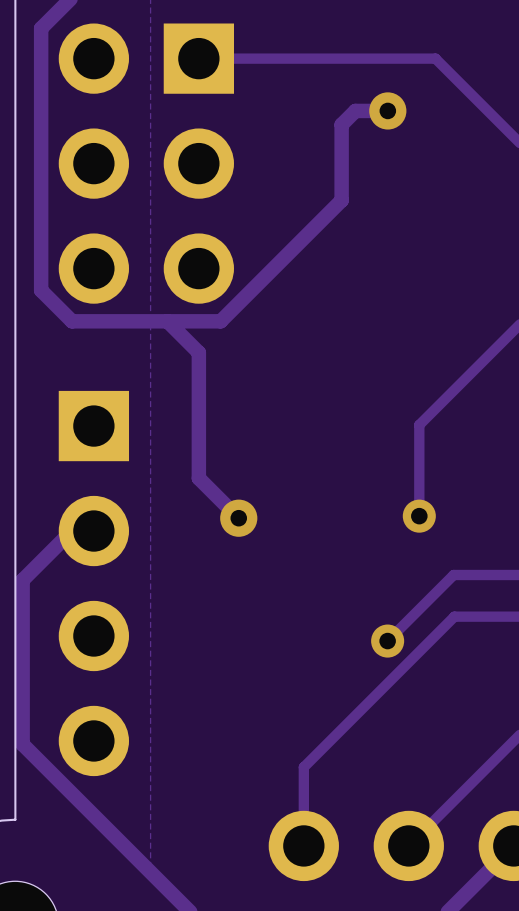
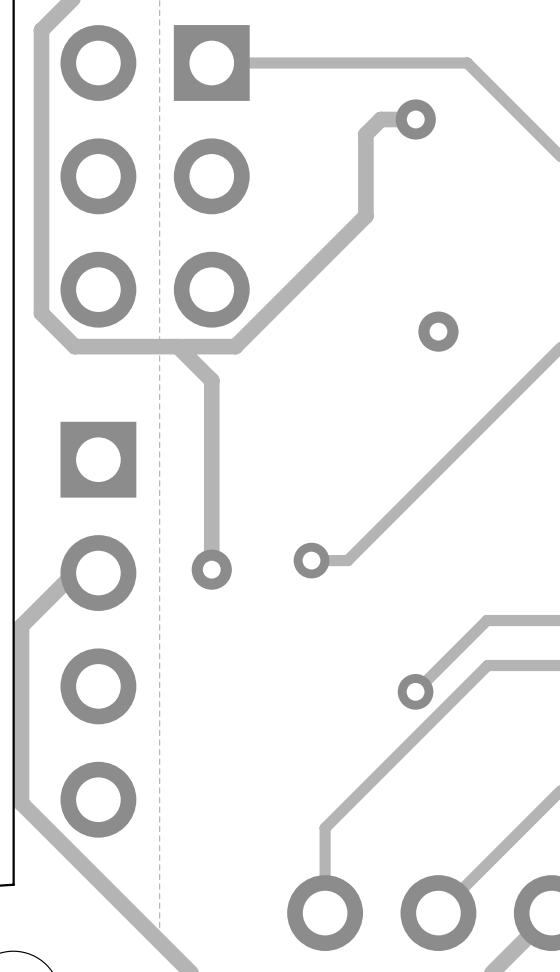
via: none -> (438, 331)
track: (419, 424) (419, 516) -> (449, 458) (347, 560) (311, 560)
track: (198, 478) (238, 518) -> (211, 516) (211, 569)
via position: (419, 516) -> (311, 560)
via position: (238, 518) -> (211, 569)

